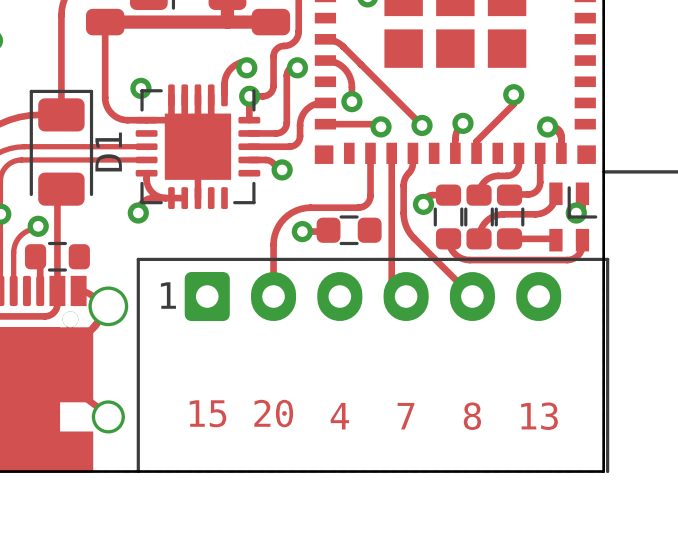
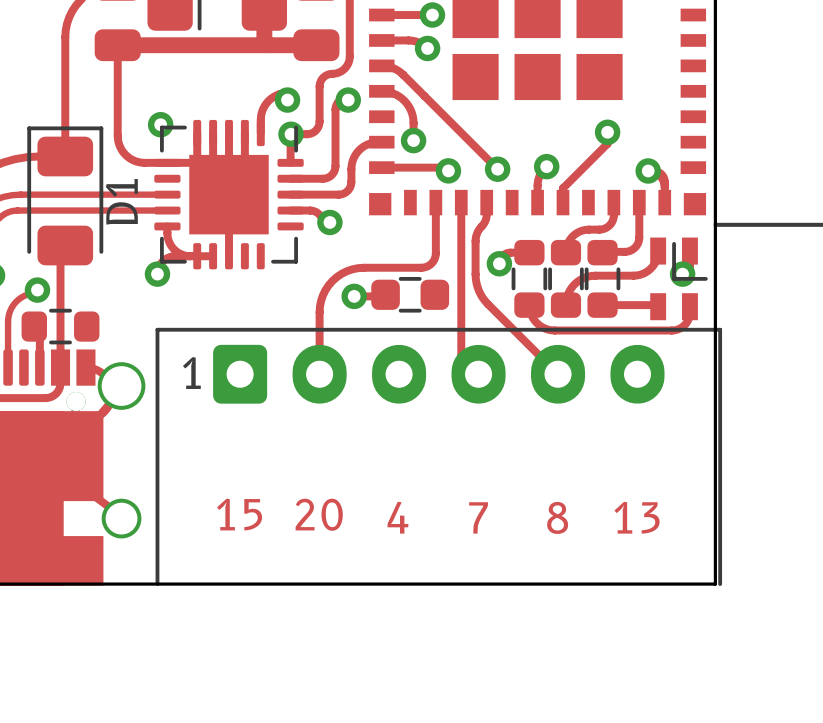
track: none -> (381, 40) (411, 40) (421, 43) (427, 48)
via: none -> (427, 48)

